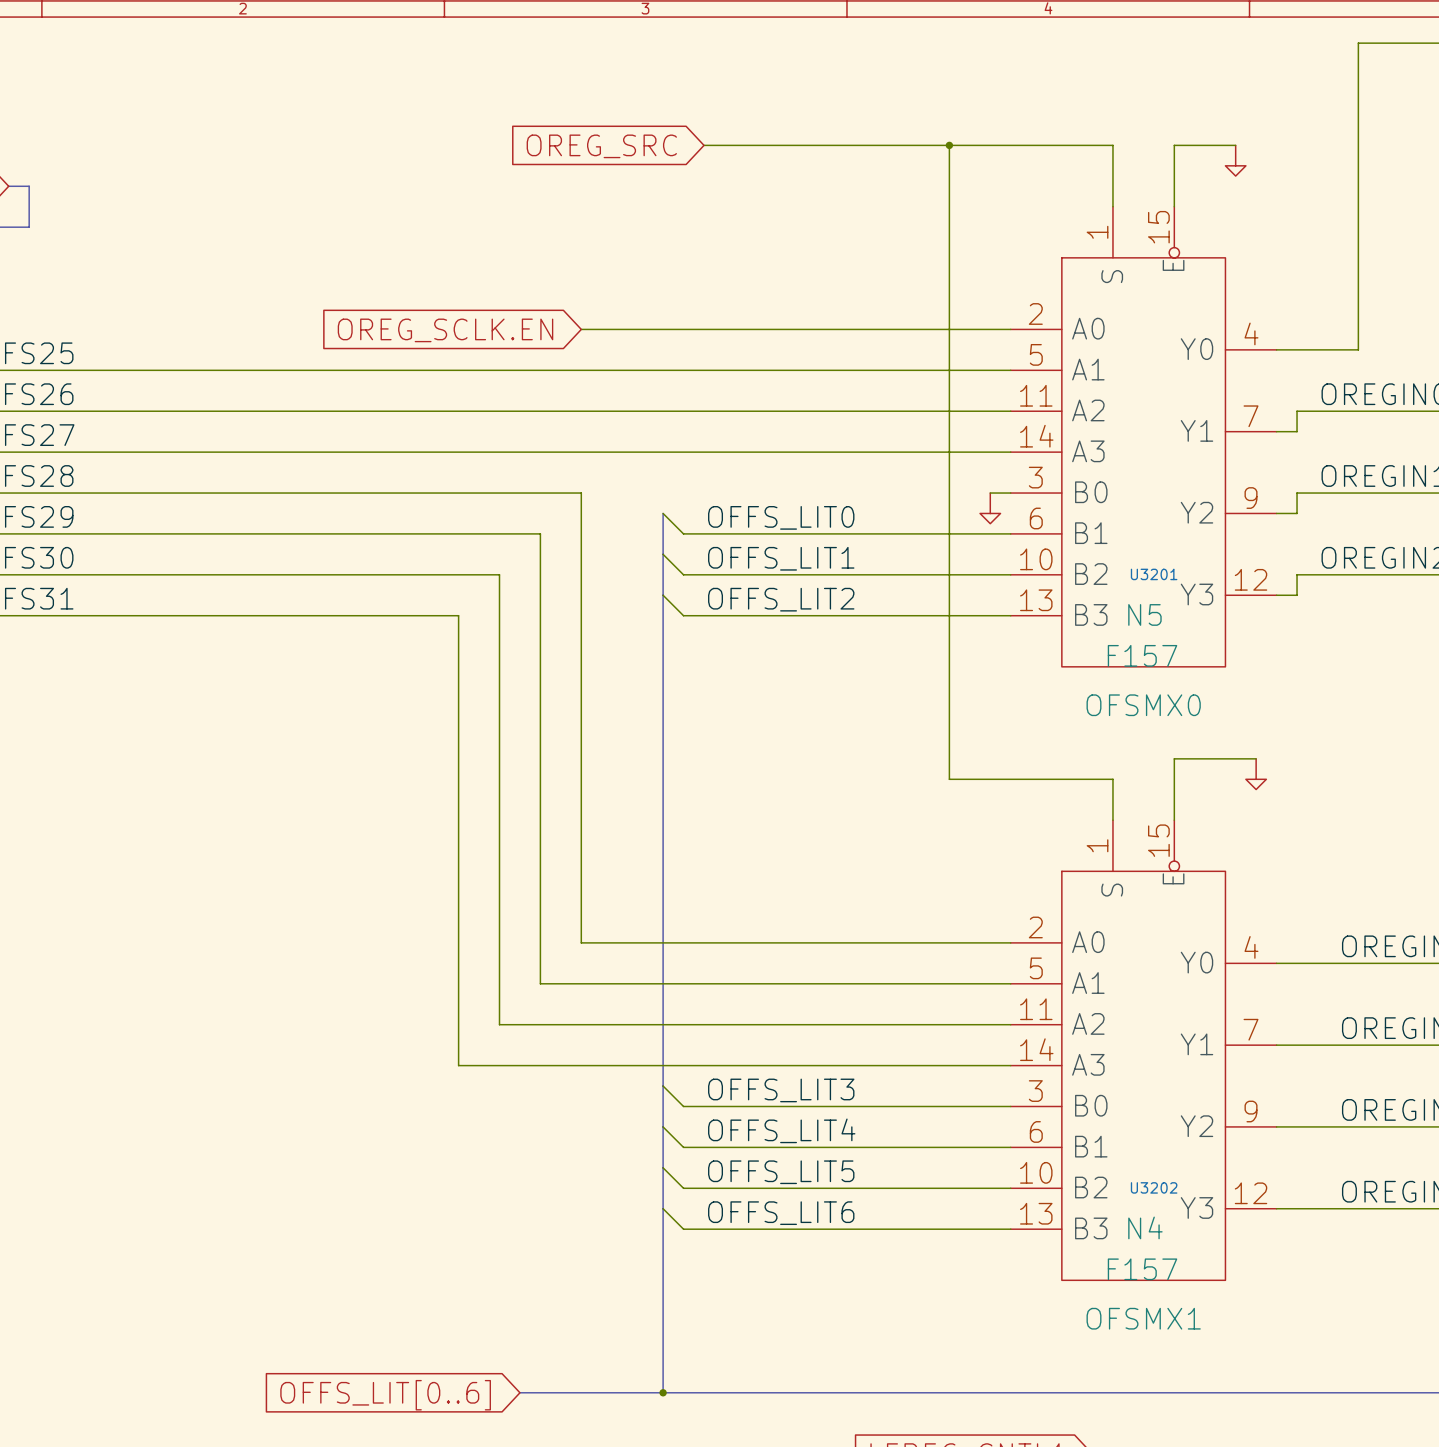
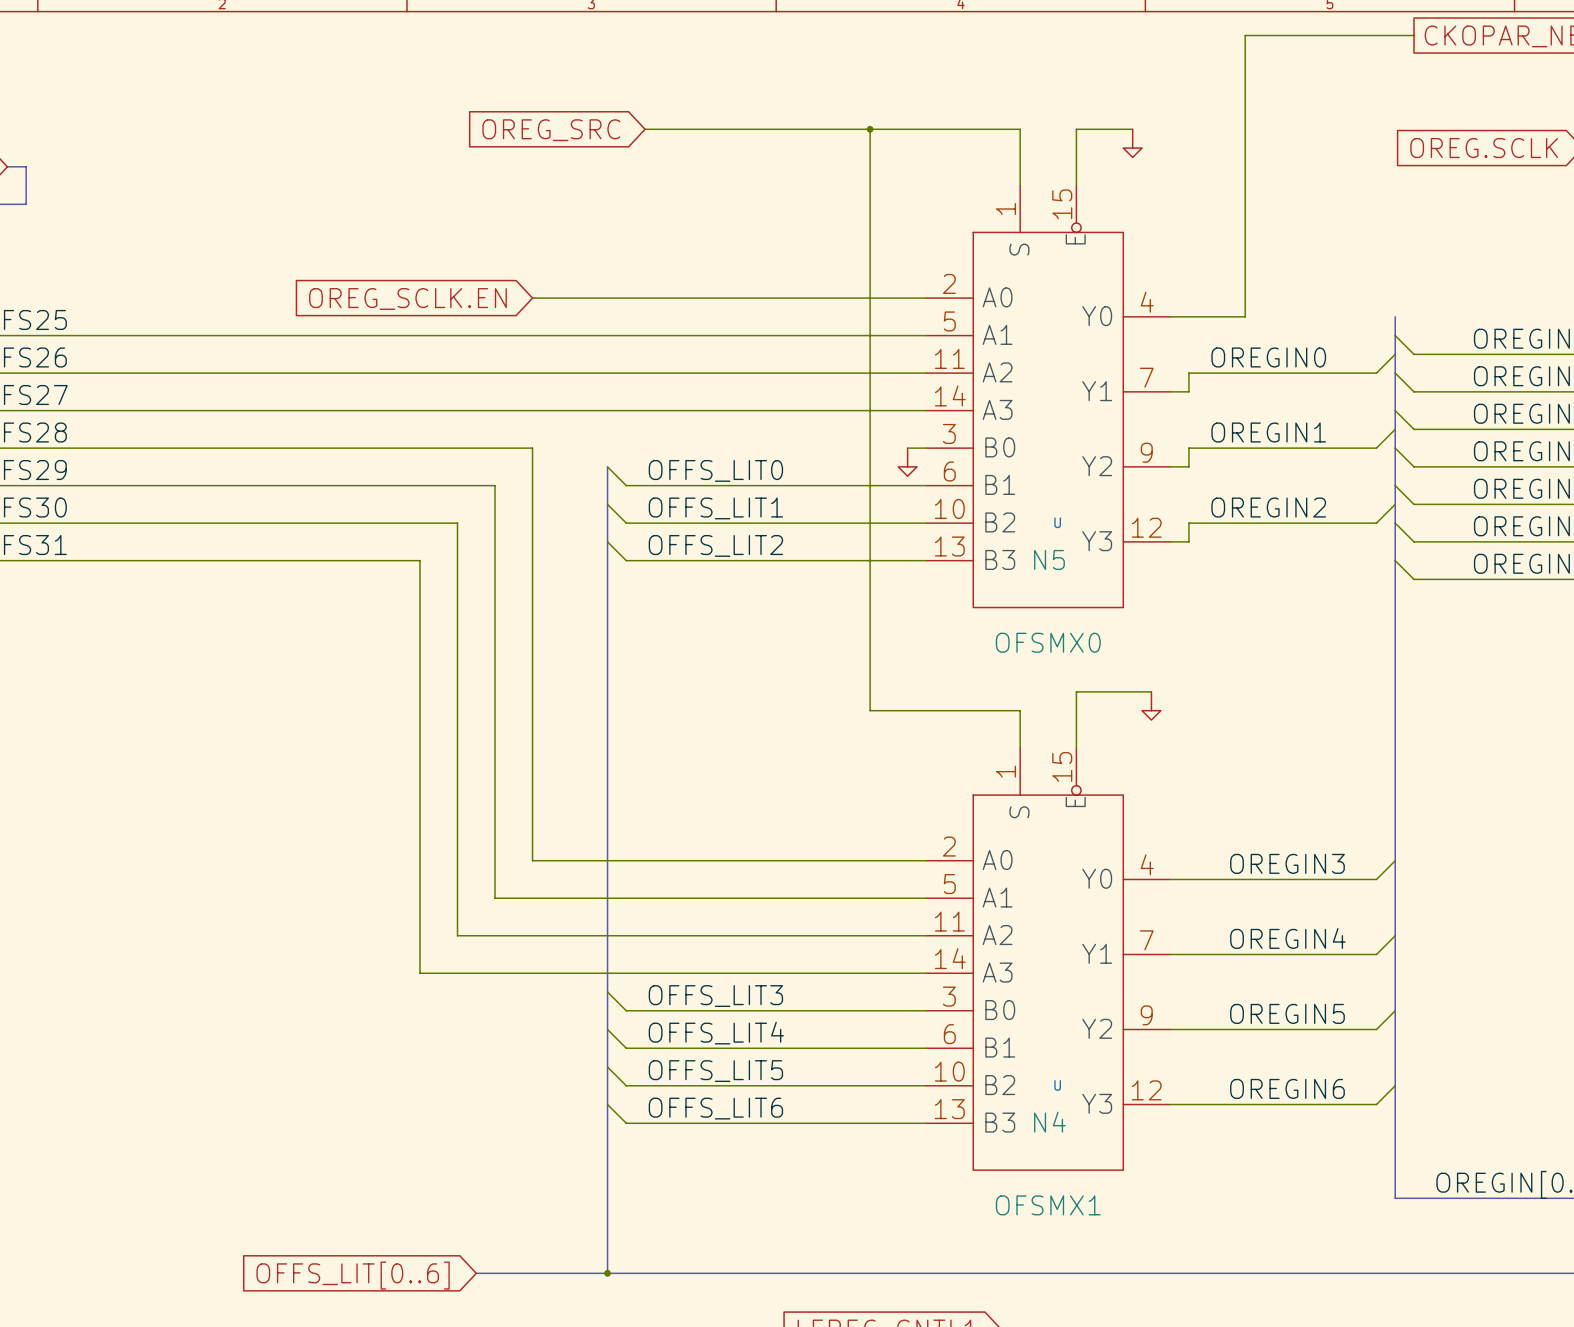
U3201 name: U3201 (1154, 574) -> U (1057, 522)
U3201 value: F157 (1142, 655) -> none
U3202 name: U3202 (1154, 1187) -> U (1057, 1085)
U3202 value: F157 (1142, 1269) -> none

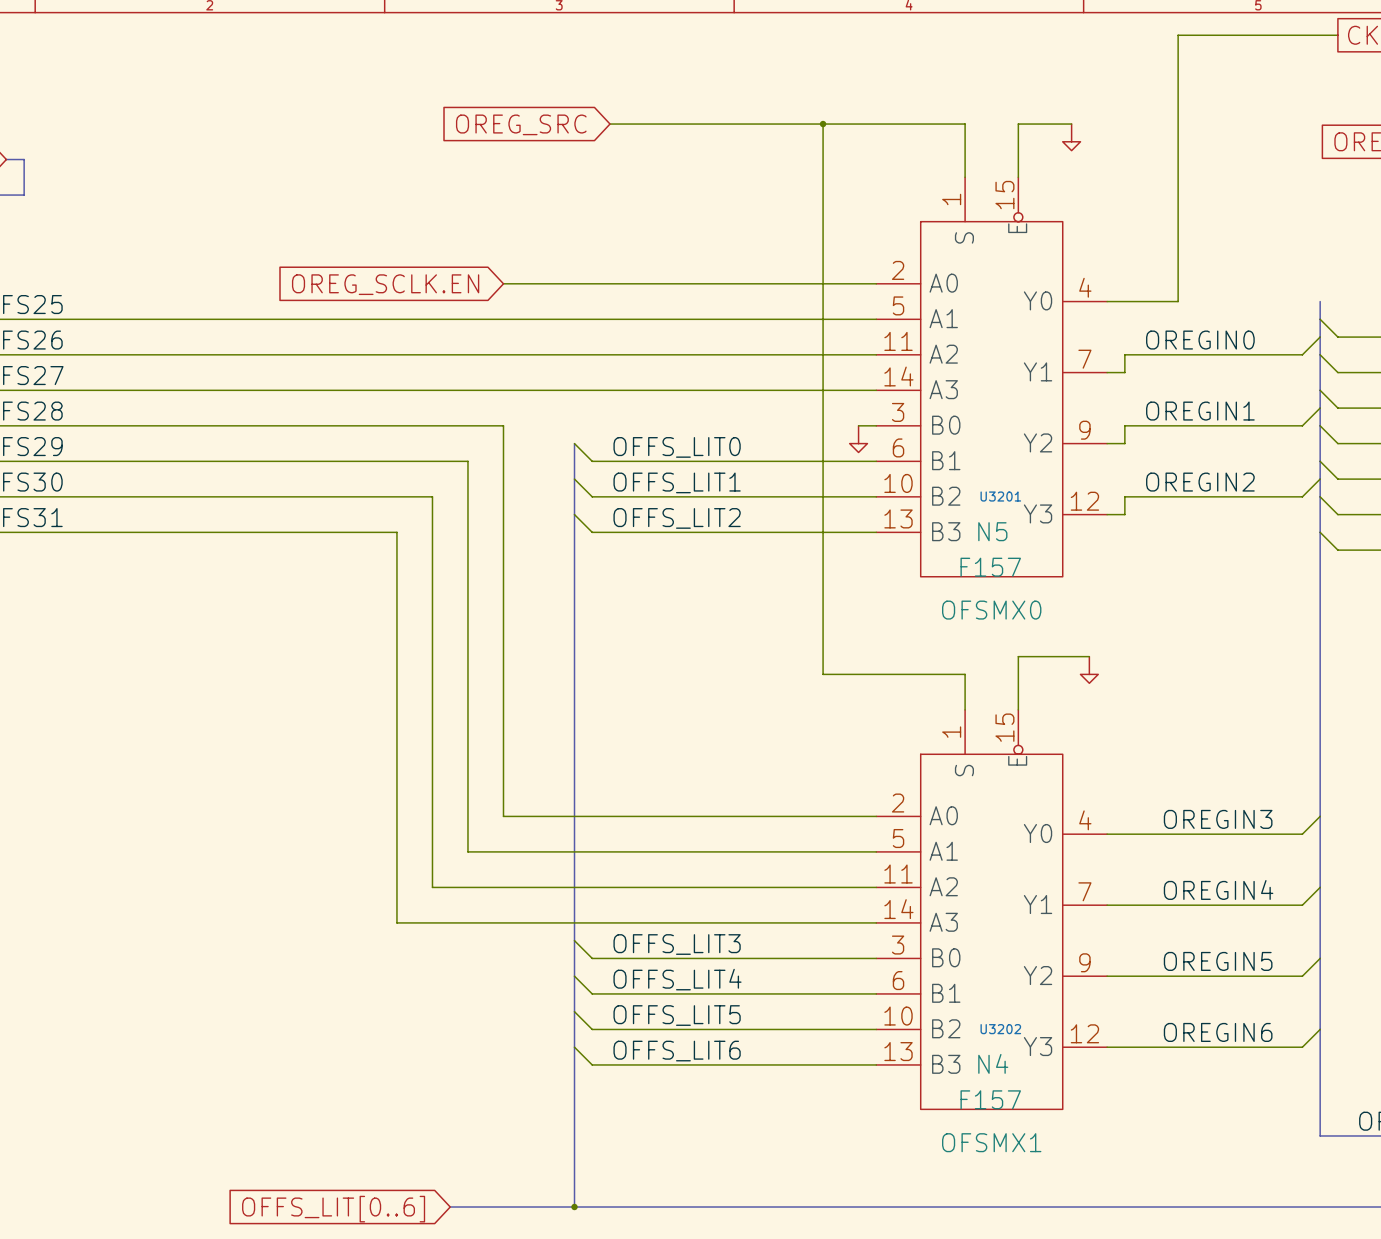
U name: U (1057, 522) -> U3201 (1000, 496)
U value: none -> F157 (990, 567)
U name: U (1057, 1085) -> U3202 (1000, 1029)
U value: none -> F157 (990, 1099)

